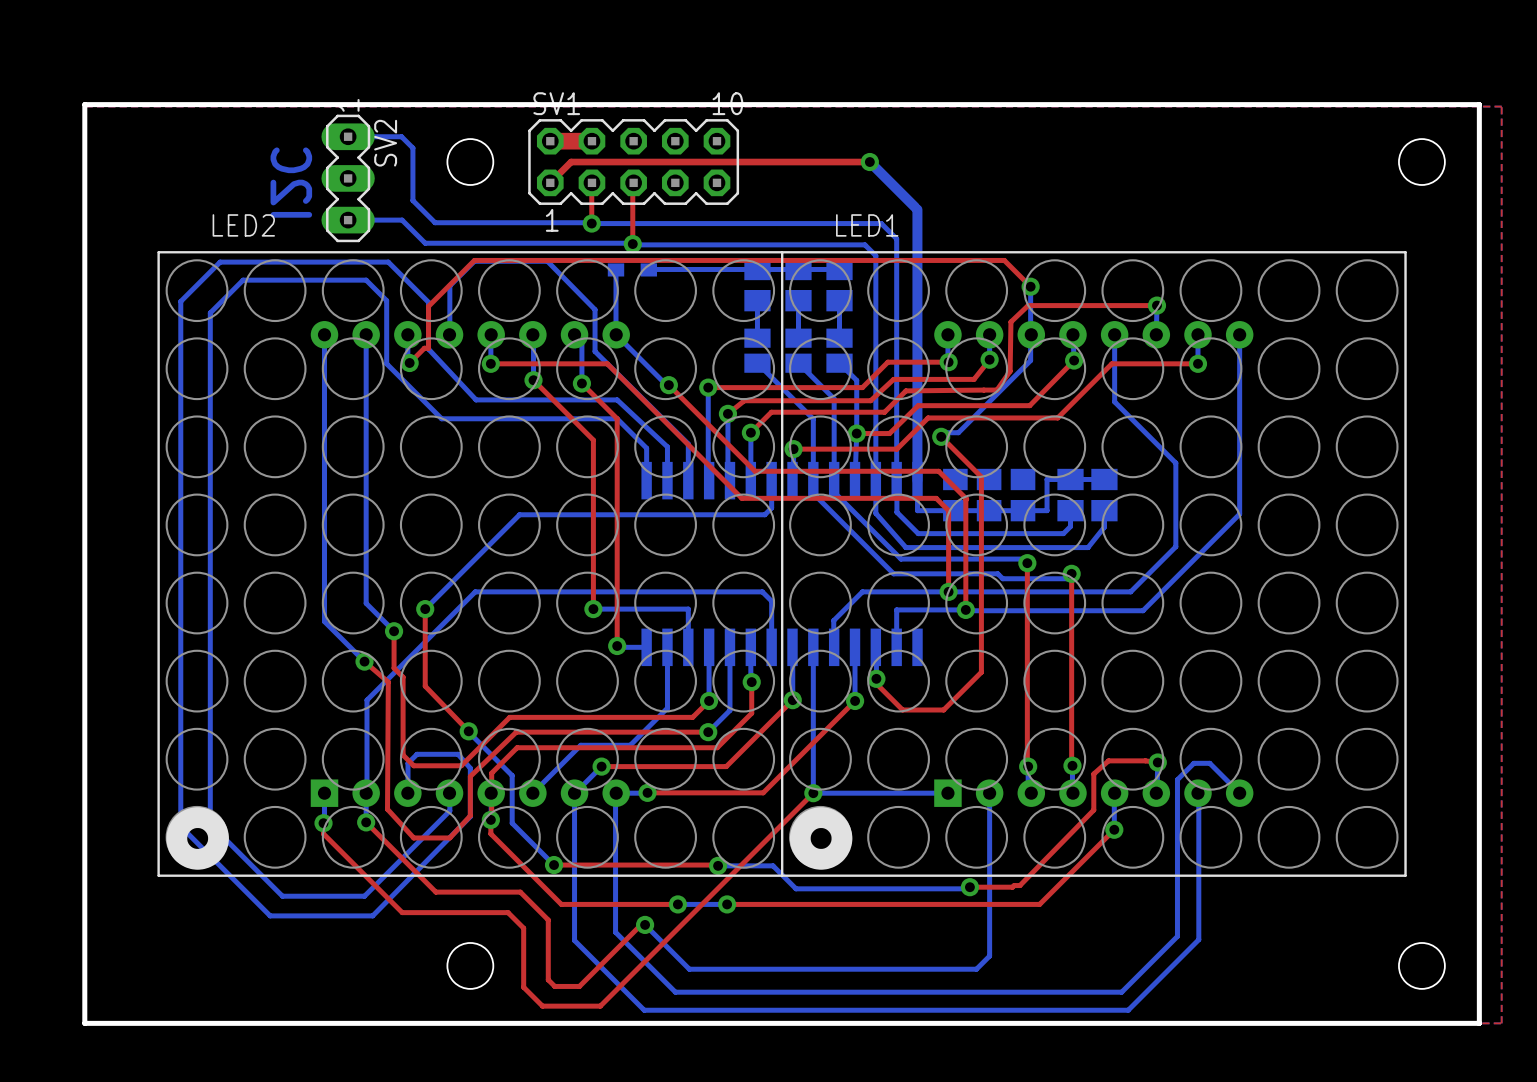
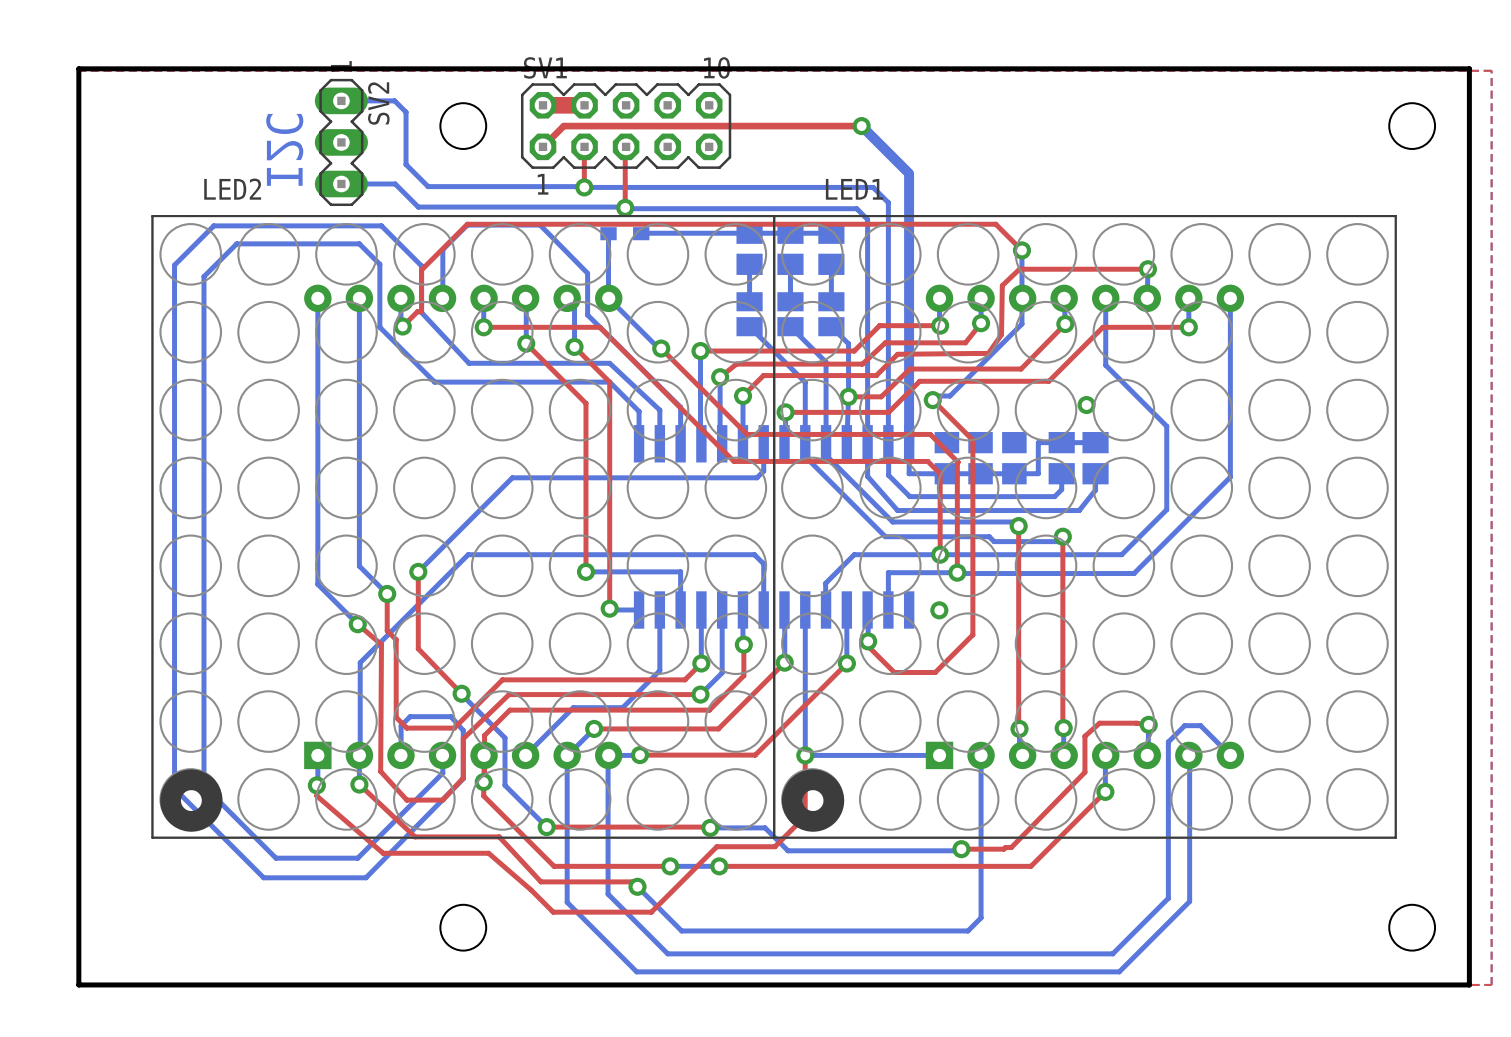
via: none -> (1086, 405)
via: none -> (939, 610)
top track: (813, 793) (600, 1006) (542, 1006) (523, 987) (523, 928) (508, 912) (402, 912) (323, 833) -> (805, 755) (805, 816) (774, 846) (716, 846) (651, 912) (553, 912) (488, 853) (383, 853) (316, 796)
top track: (366, 822) (435, 892) (520, 892) (548, 920) (548, 979) (554, 986) (579, 986) (640, 924) -> (359, 784) (415, 836) (499, 836) (540, 881) (632, 881) (637, 886)

